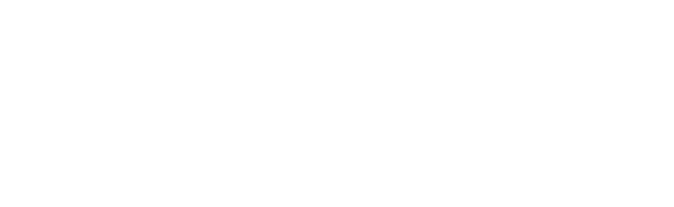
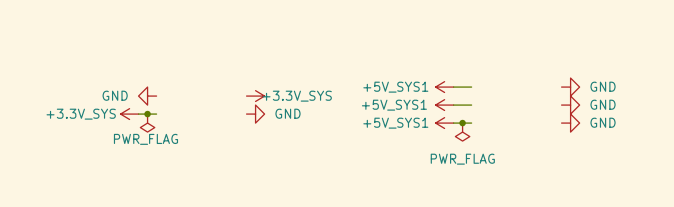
power symbol: none -> +5V_SYS1 (444, 87)
wire: none -> (453, 87) (471, 87)
power symbol: none -> GND (570, 87)
power symbol: none -> GND (147, 96)
power symbol: none -> +3.3V_SYS (255, 96)
power symbol: none -> +5V_SYS1 (444, 105)
wire: none -> (453, 105) (471, 105)
power symbol: none -> GND (570, 105)
power symbol: none -> +3.3V_SYS (129, 114)
wire: none -> (138, 114) (156, 114)
junction: none -> (147, 114)
power symbol: none -> GND (255, 114)
power symbol: none -> PWR_FLAG (147, 123)
power symbol: none -> +5V_SYS1 (444, 123)
wire: none -> (453, 123) (471, 123)
junction: none -> (462, 123)
power symbol: none -> GND (570, 123)
power symbol: none -> PWR_FLAG (462, 132)

